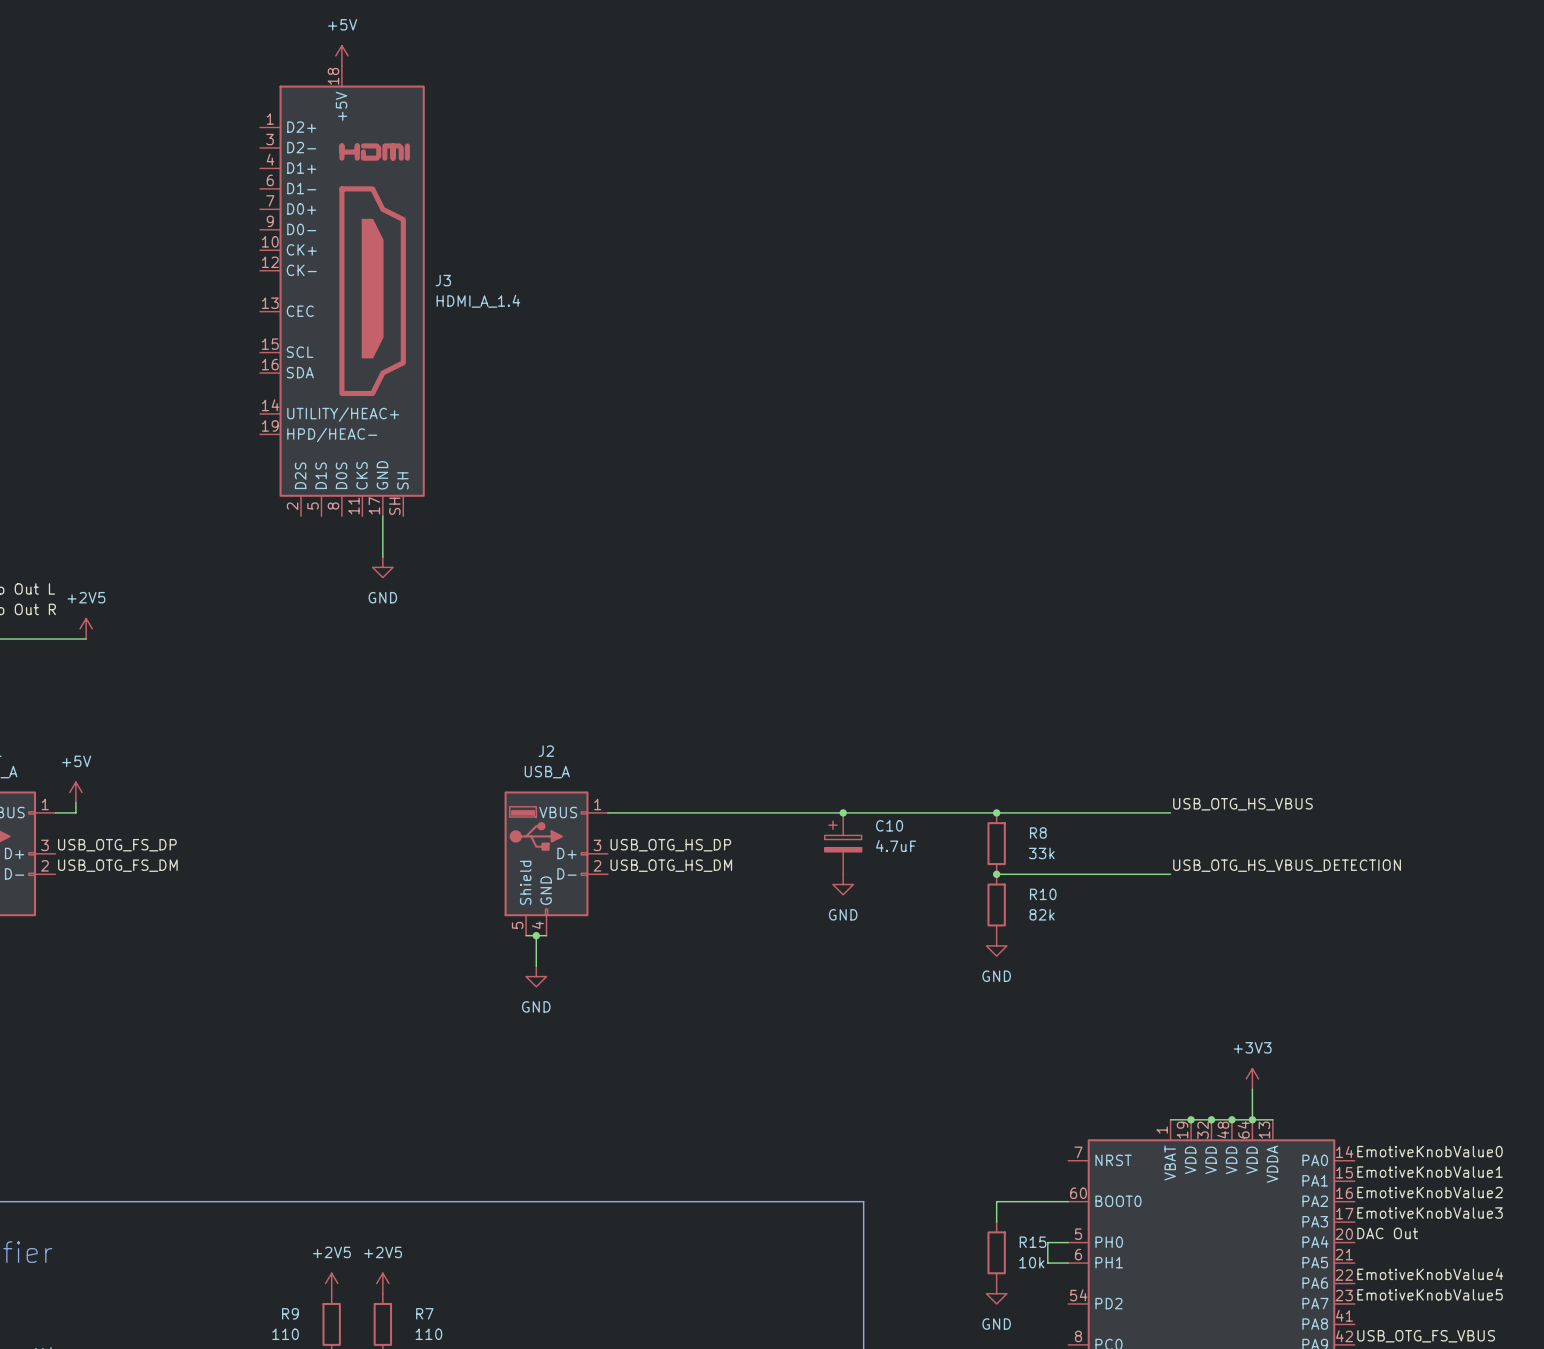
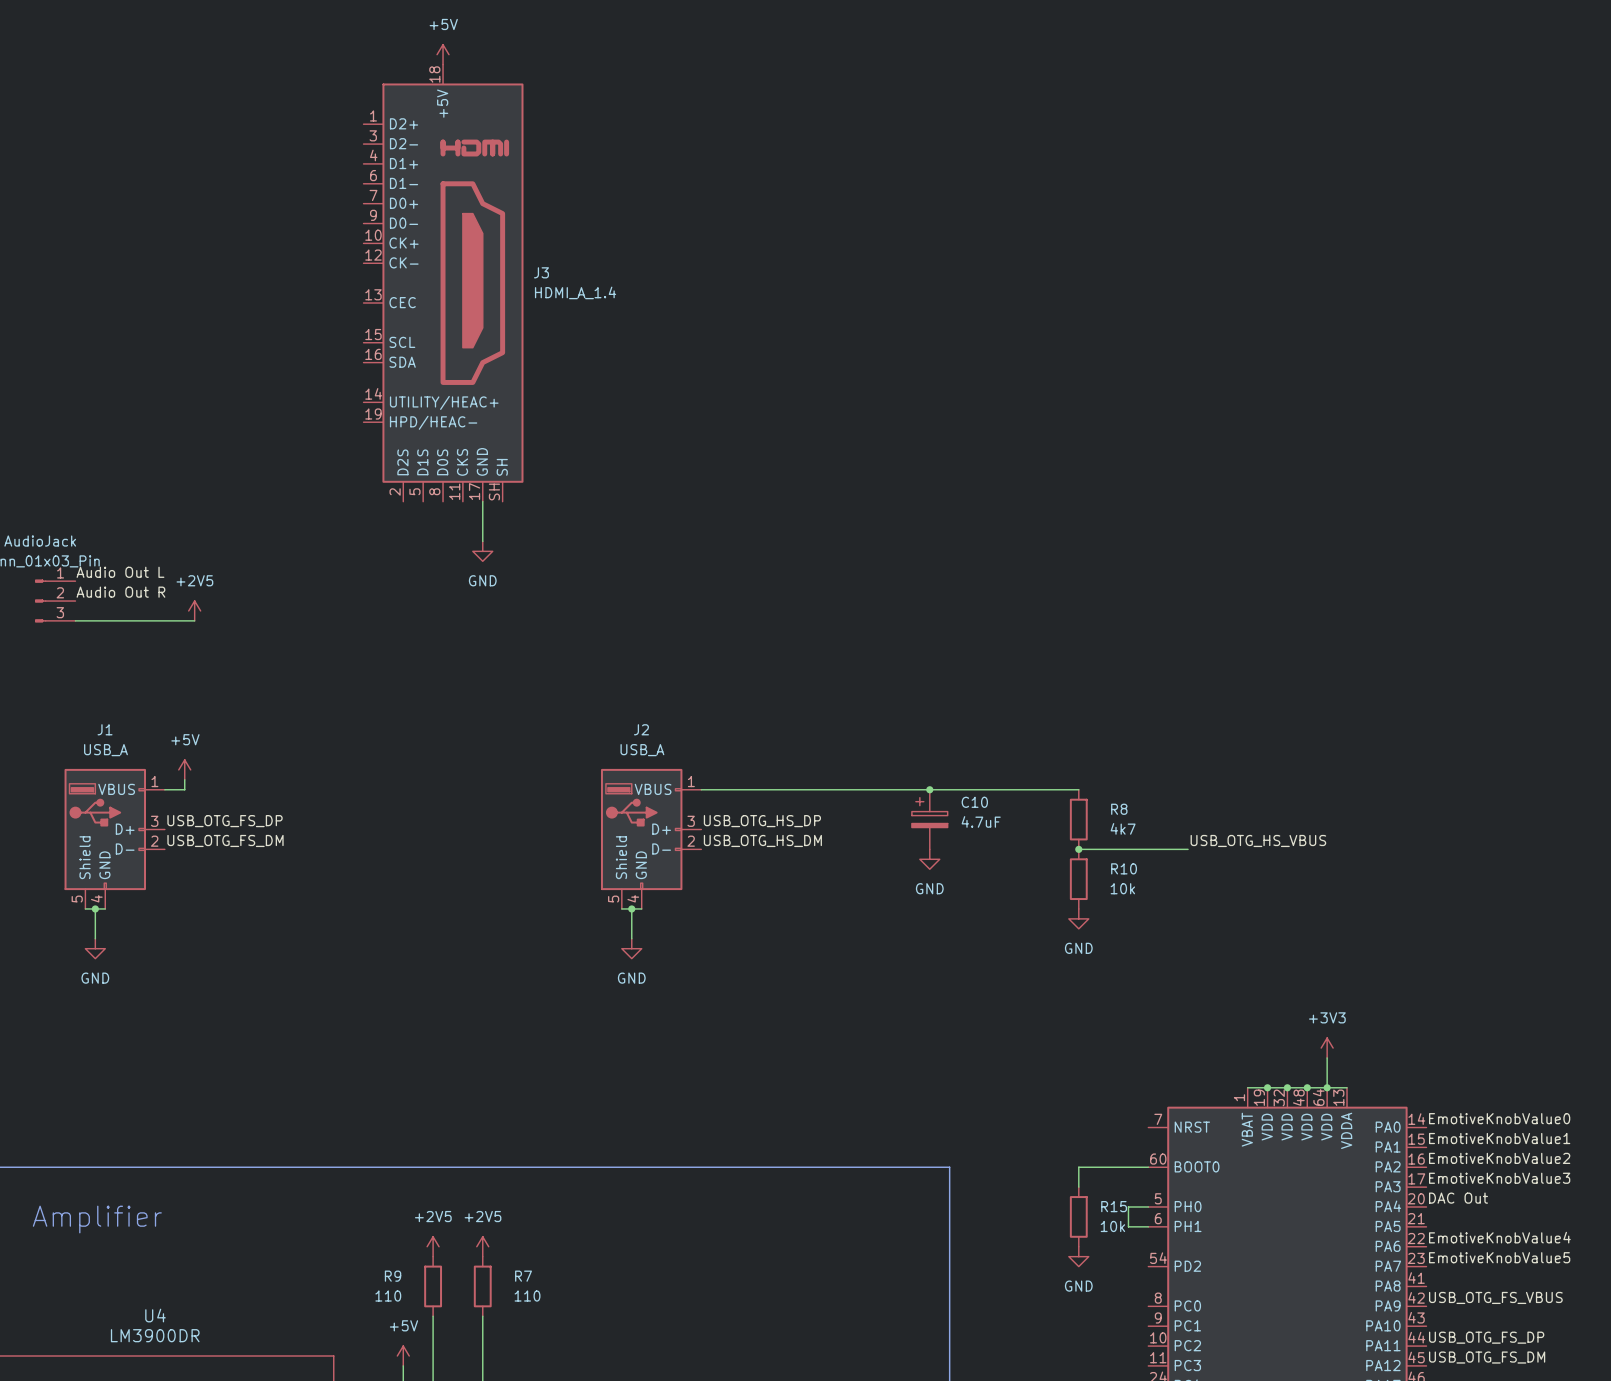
label position: USB_OTG_HS_VBUS (1242, 804) -> USB_OTG_HS_VBUS (1258, 840)
wire: (996, 812) (1170, 812) -> none
junction: (996, 812) -> none
R8 value: 33k (1041, 853) -> 4k7 (1123, 828)
label: USB_OTG_HS_VBUS_DETECTION (1287, 865) -> none
wire: (1109, 874) (1170, 874) -> none
R10 value: 82k (1042, 914) -> 10k (1122, 888)

